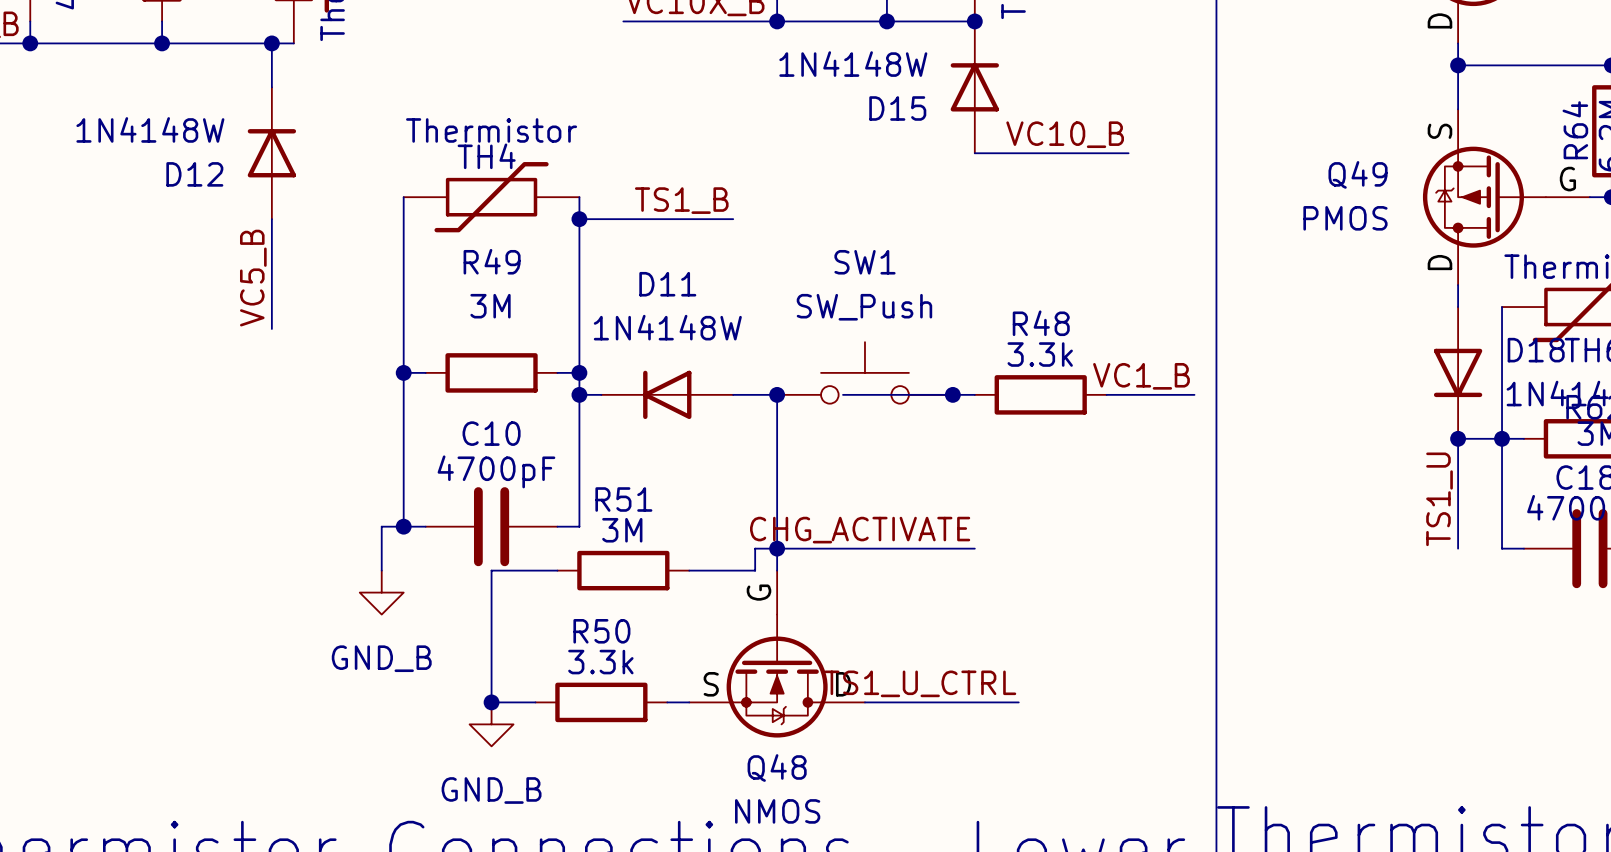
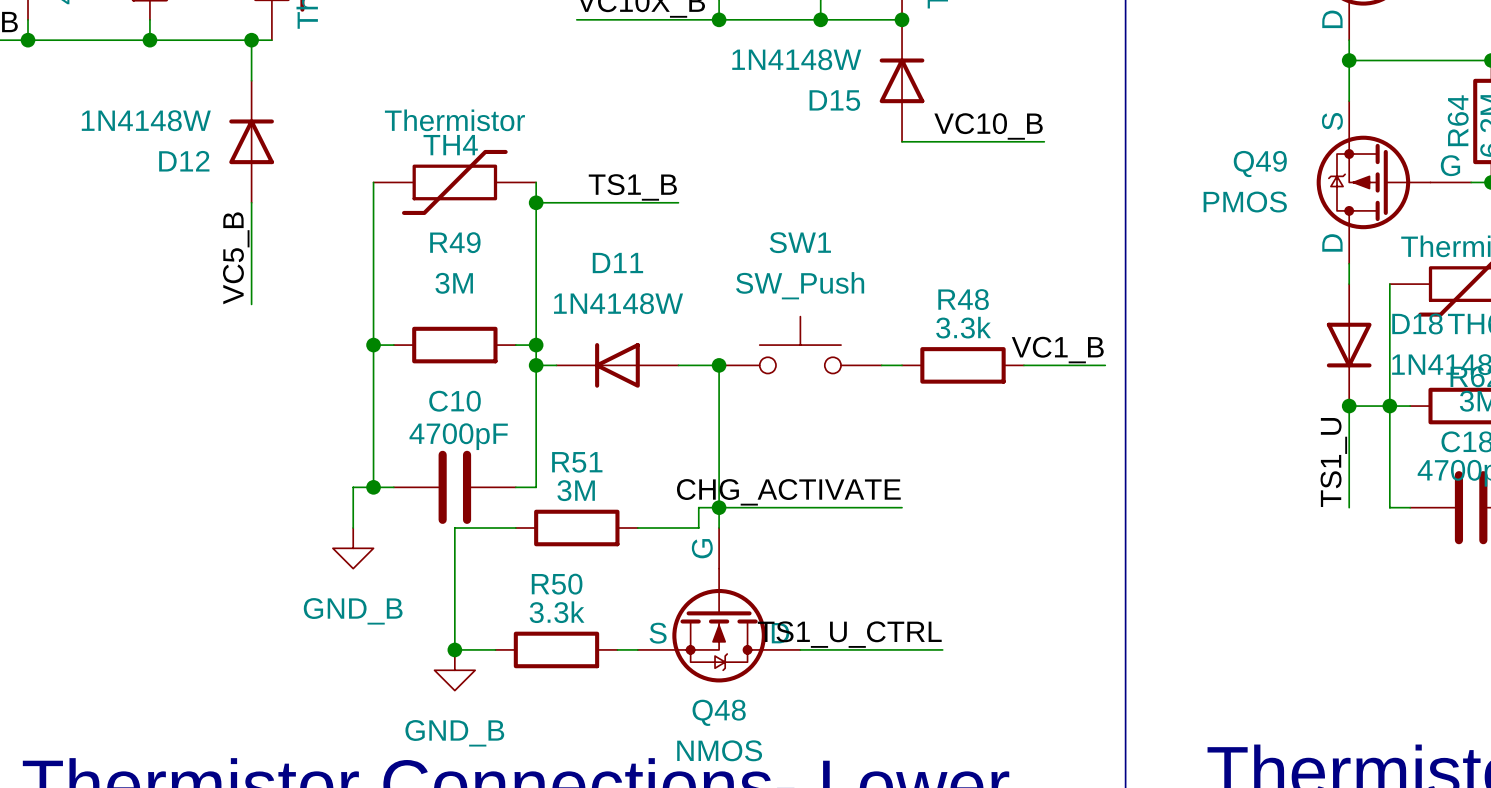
wire: (843, 394) (952, 394) -> none
junction: (952, 394) -> none

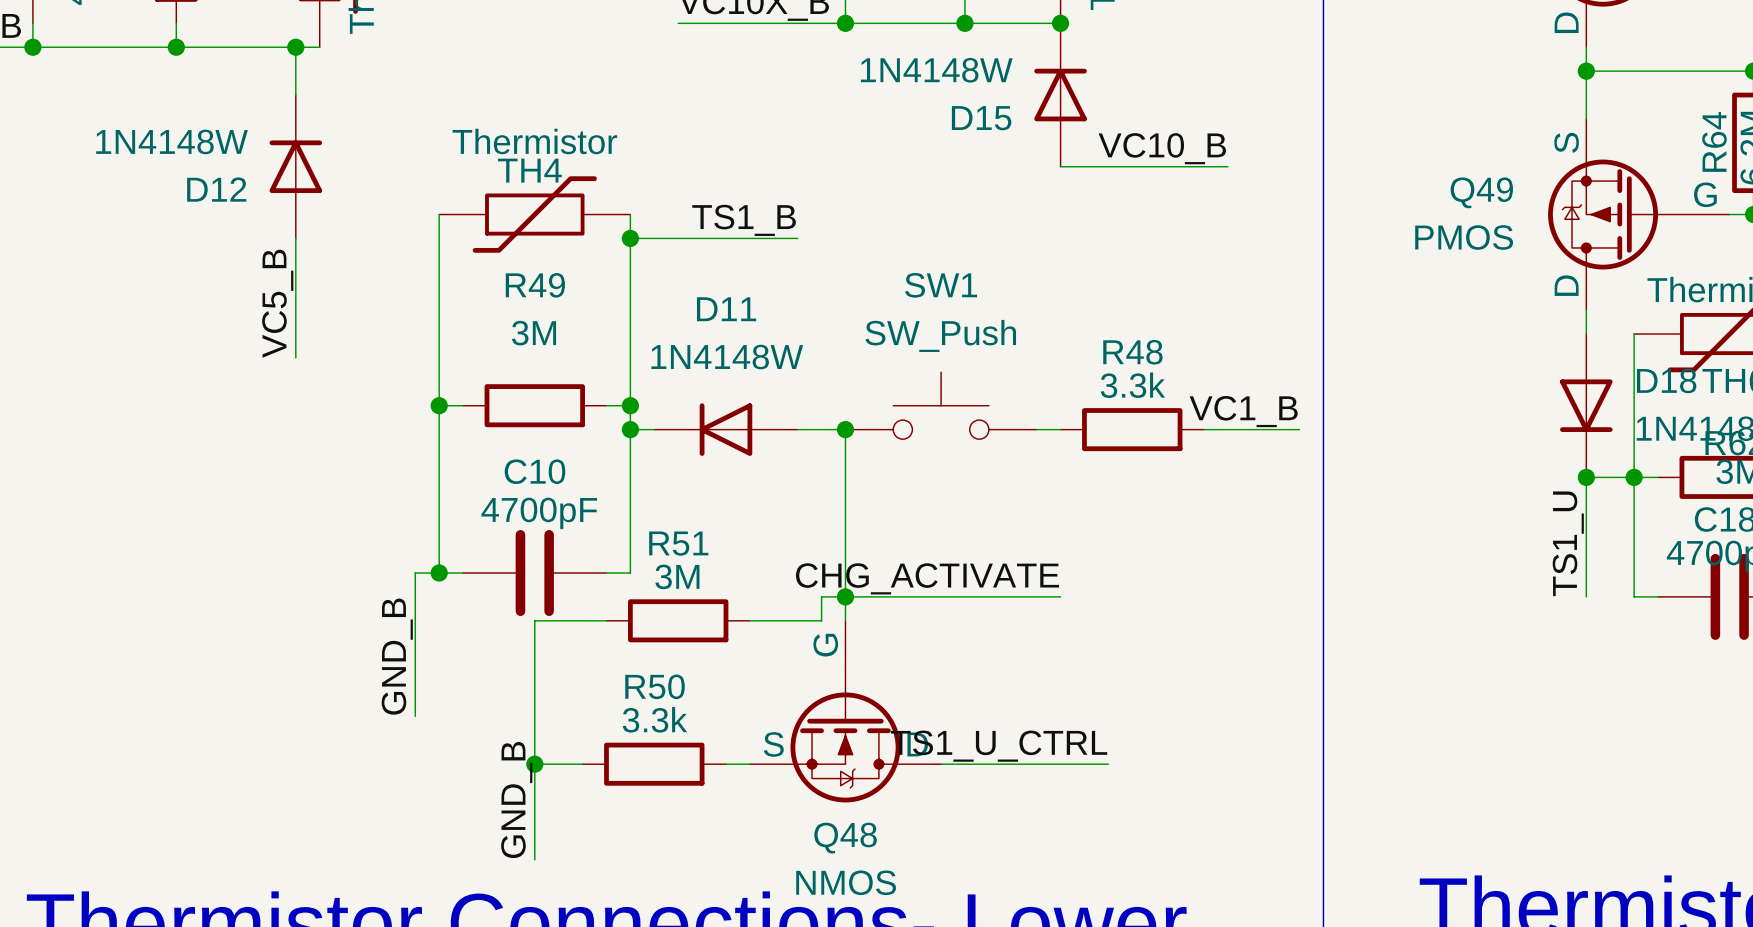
wire: none -> (415, 620) (415, 716)
power symbol: GND_B (353, 548) -> none
label: none -> GND_B (397, 656)
wire: none -> (534, 764) (534, 859)
power symbol: GND_B (454, 670) -> none
label: none -> GND_B (516, 799)

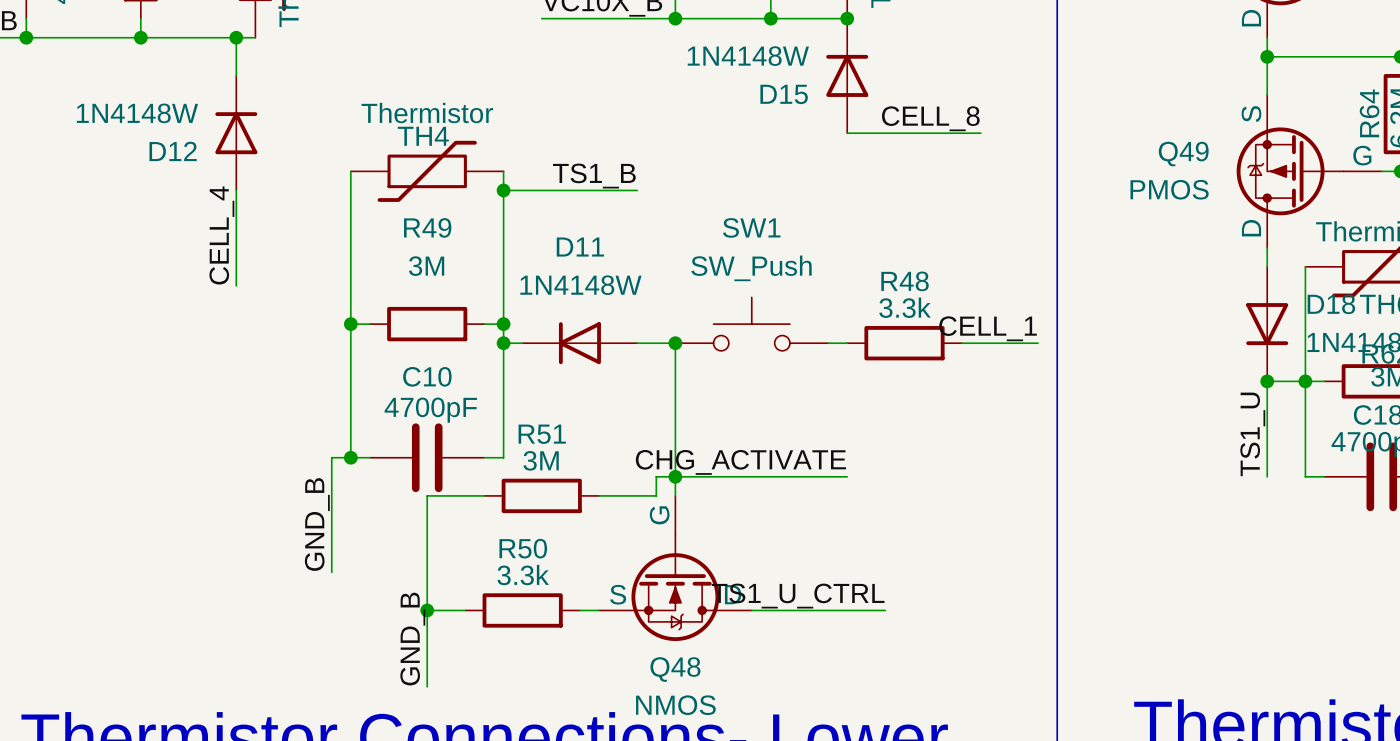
label: VC10_B (1162, 148) -> CELL_8 (930, 118)
label: VC5_B (277, 303) -> CELL_4 (221, 235)
label: VC1_B (1243, 411) -> CELL_1 (988, 328)

